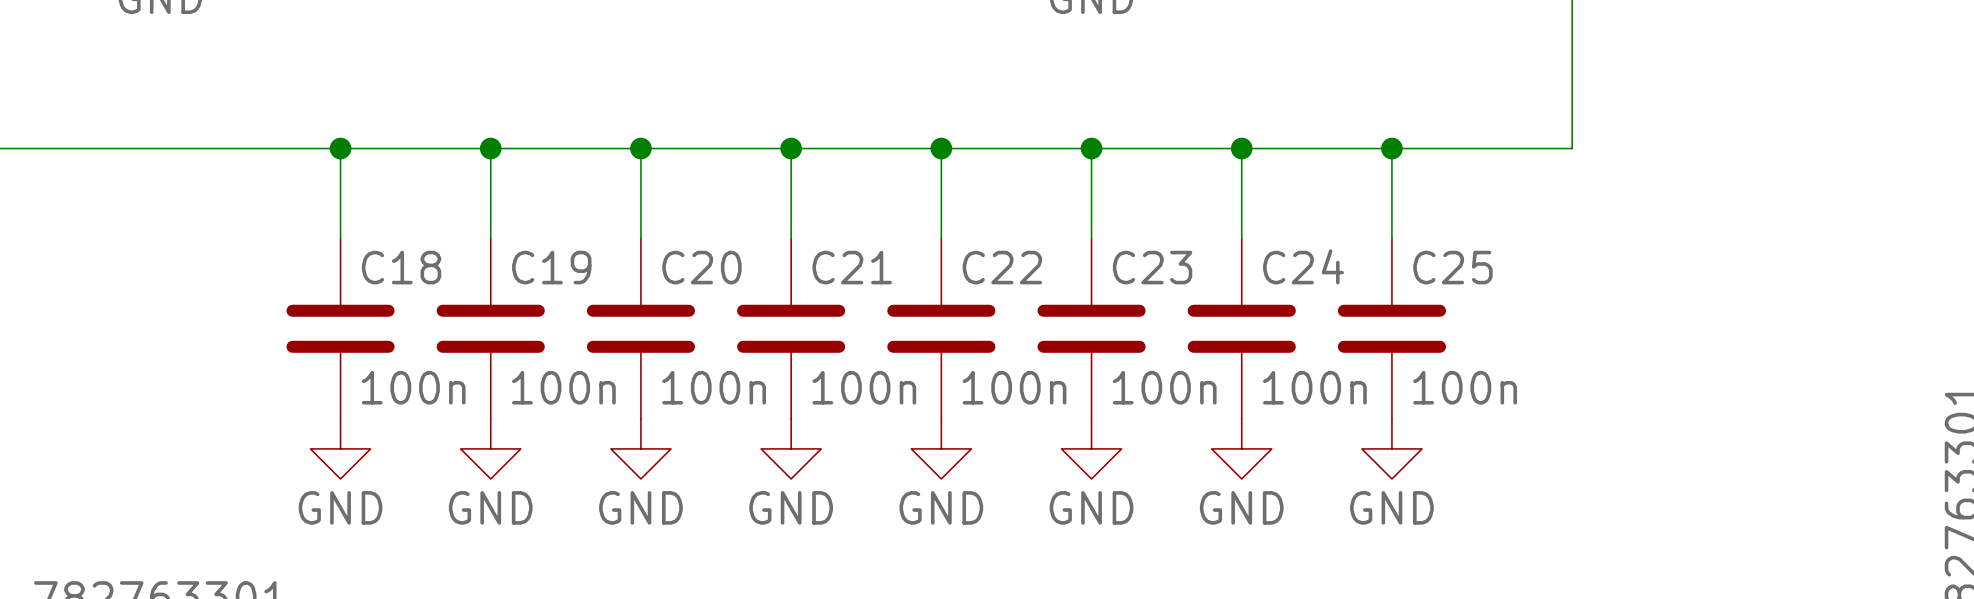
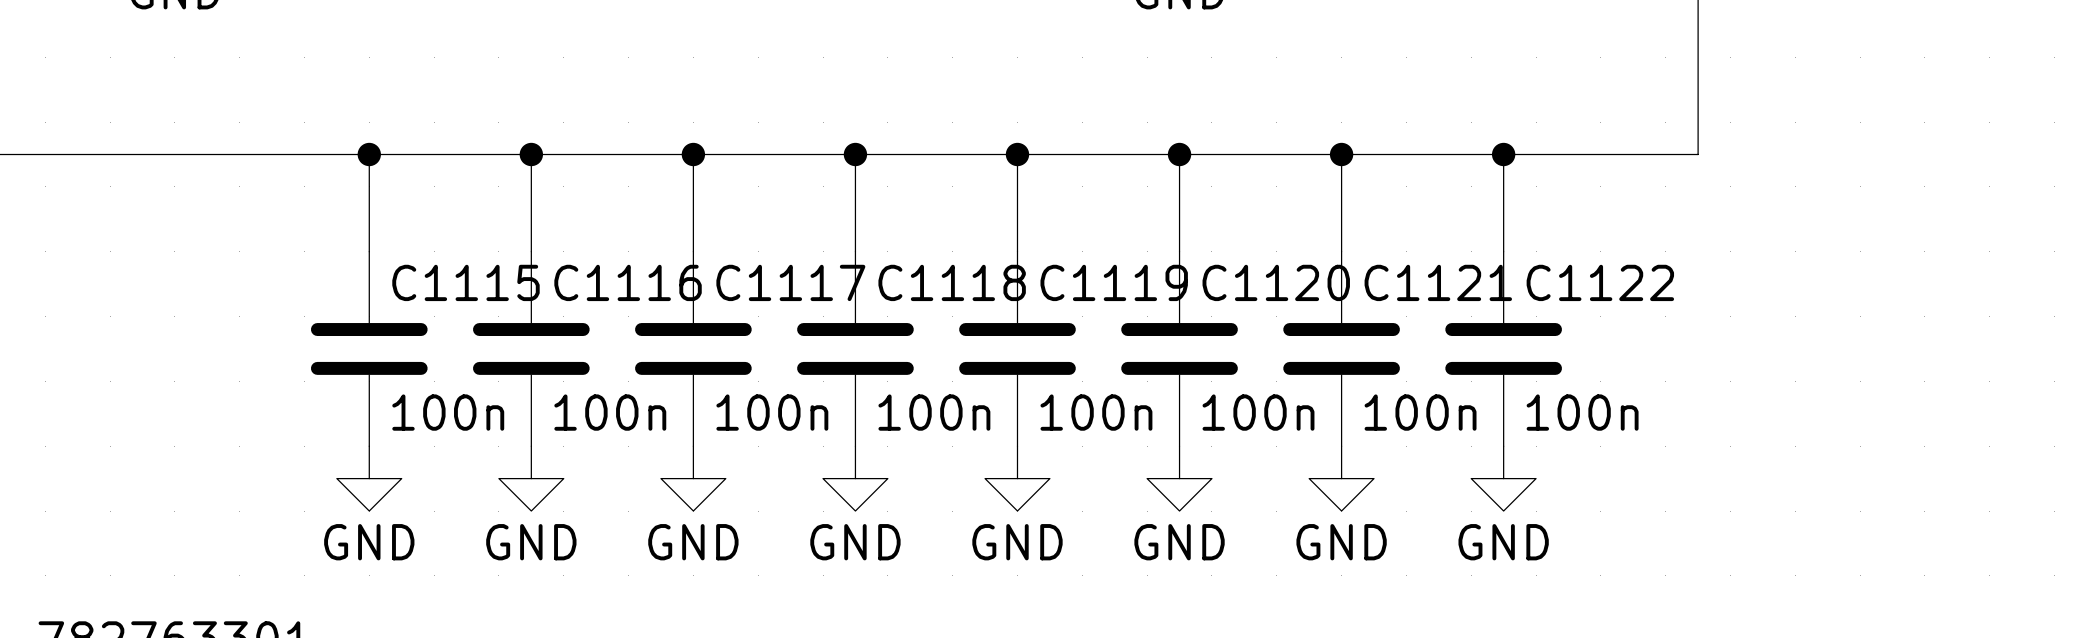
C24 name: C24 (1303, 266) -> C1121 (1438, 282)
C18 name: C18 (401, 267) -> C1115 (465, 282)
C19 name: C19 (551, 267) -> C1116 (628, 282)
C20 name: C20 (701, 267) -> C1117 (790, 282)
C21 name: C21 (852, 267) -> C1118 (952, 282)
C22 name: C22 (1002, 267) -> C1119 (1114, 282)
C23 name: C23 (1152, 267) -> C1120 (1276, 282)
C25 name: C25 (1452, 267) -> C1122 (1600, 282)

